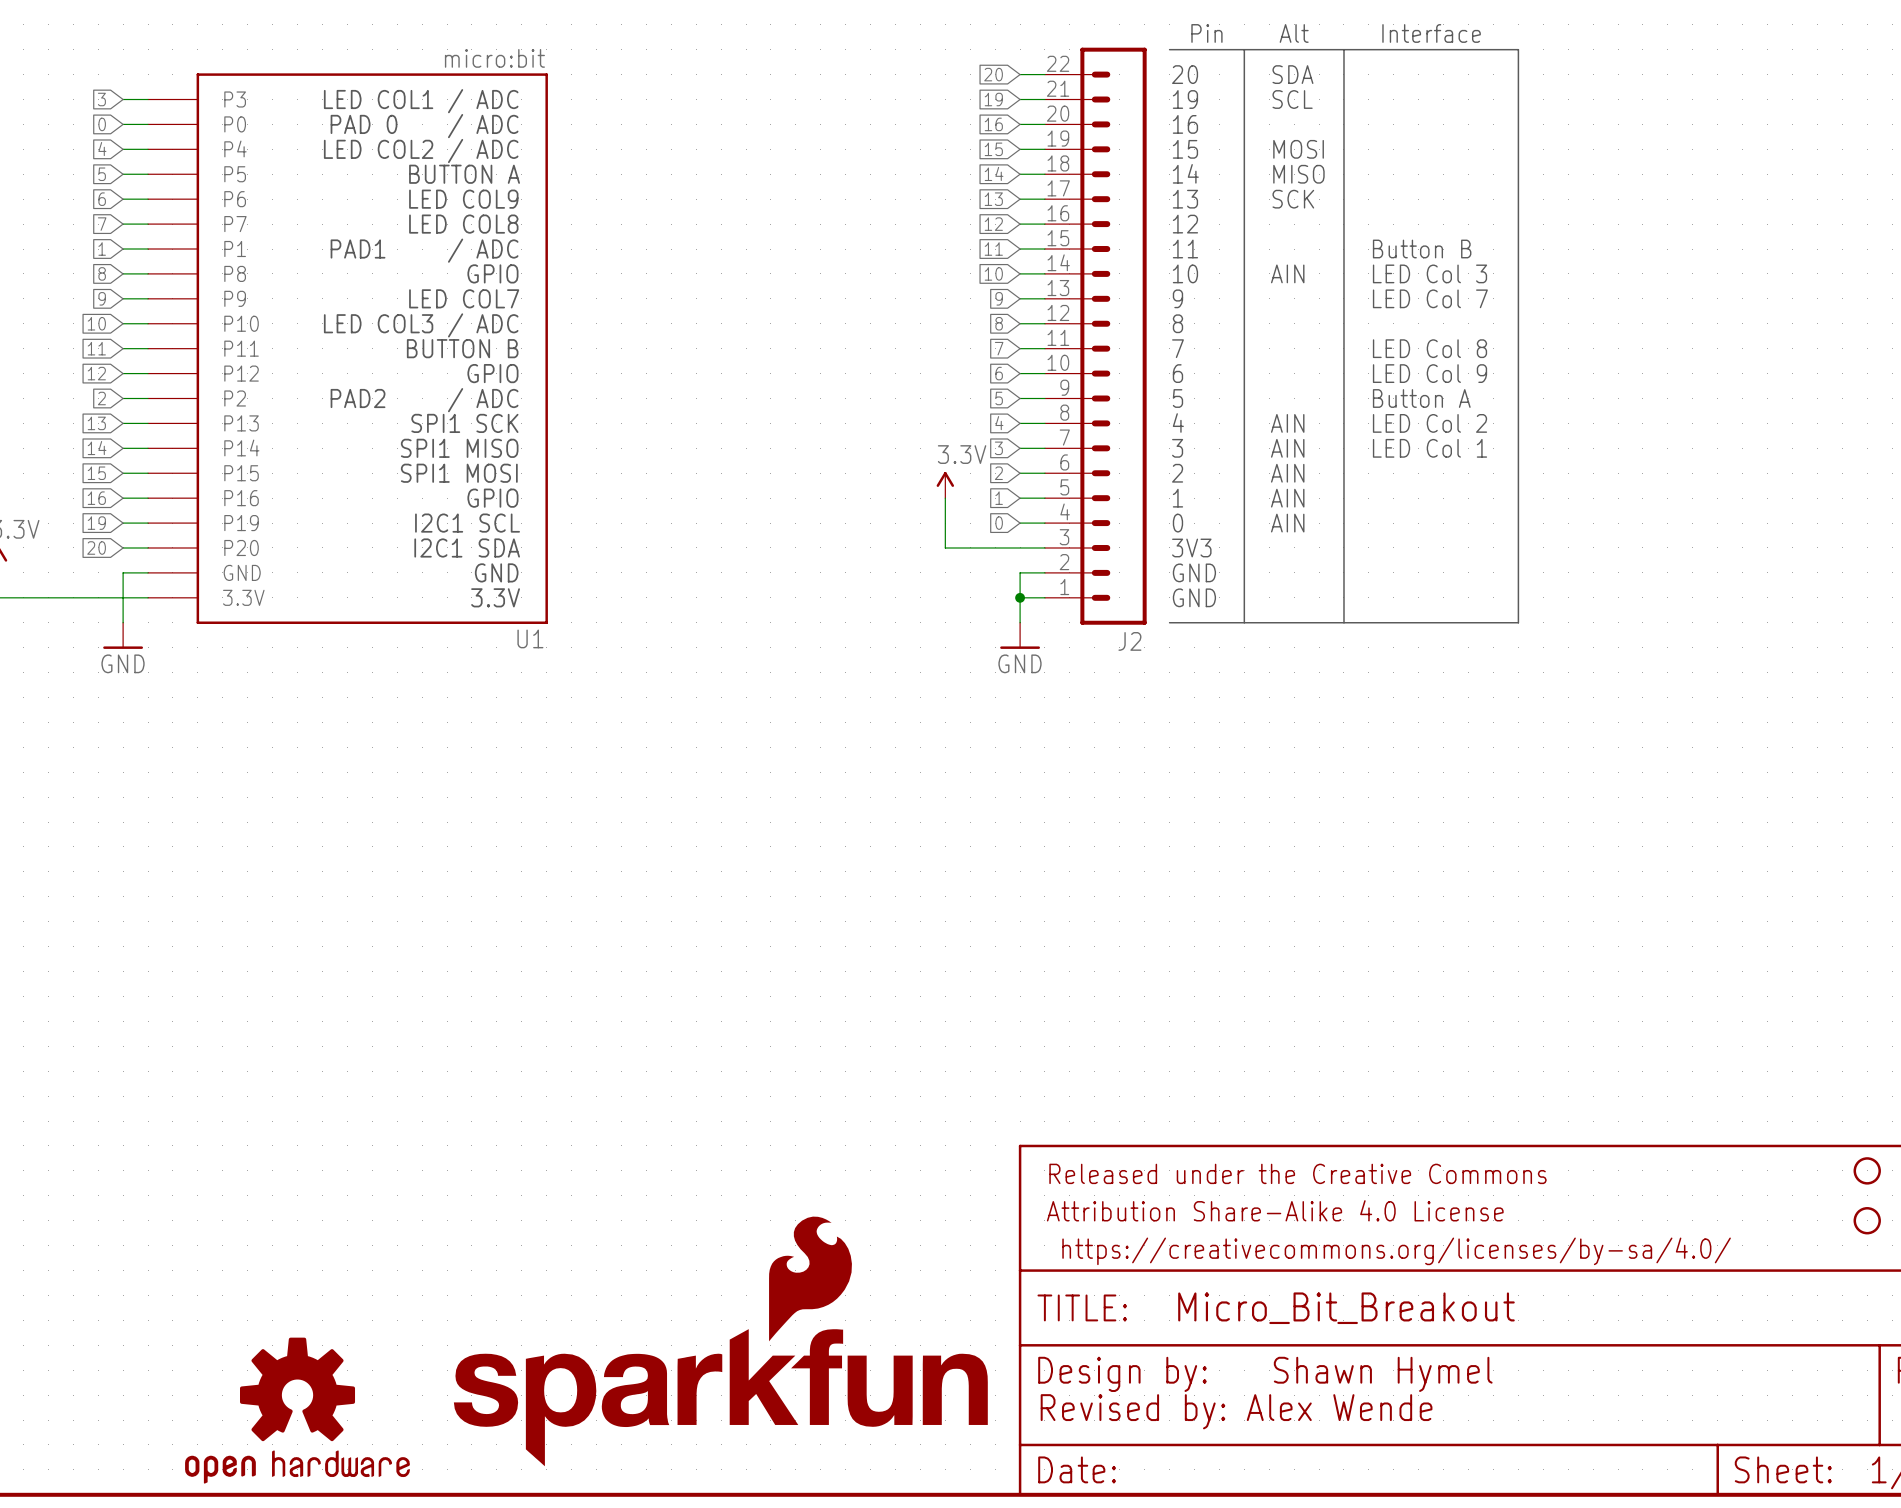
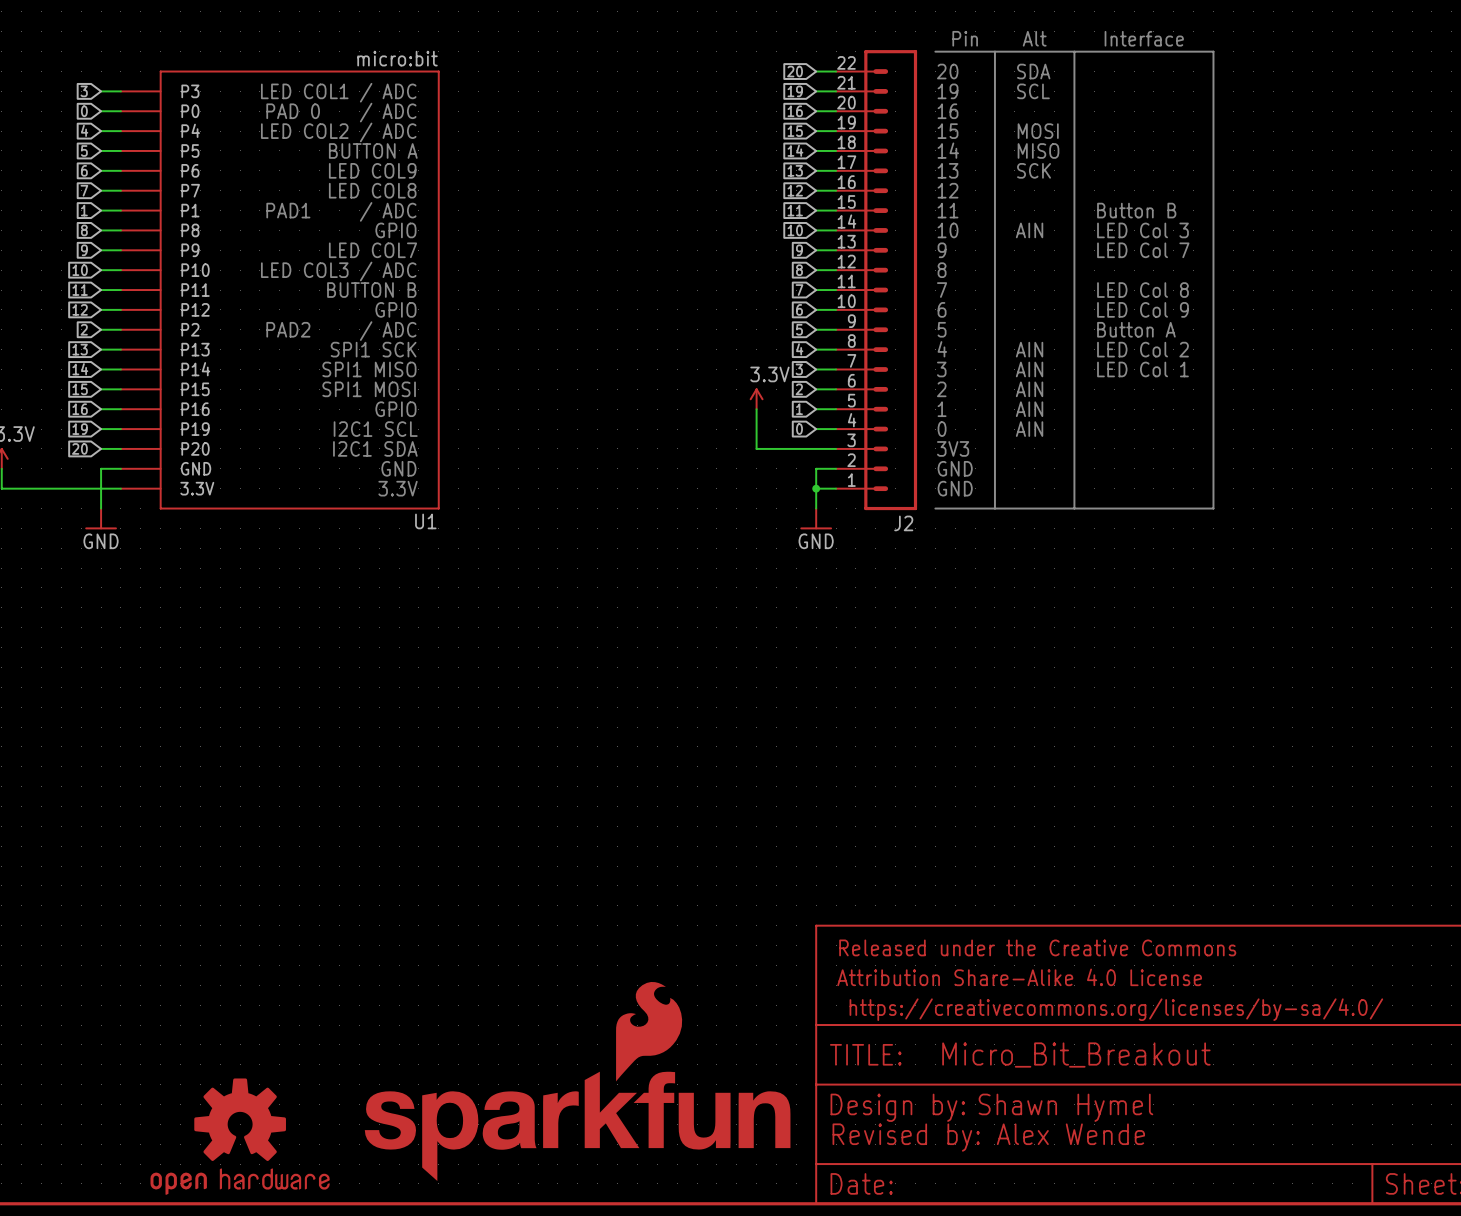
text position: Shawn Hymel (1383, 1374) -> Shawn Hymel (1065, 1107)

